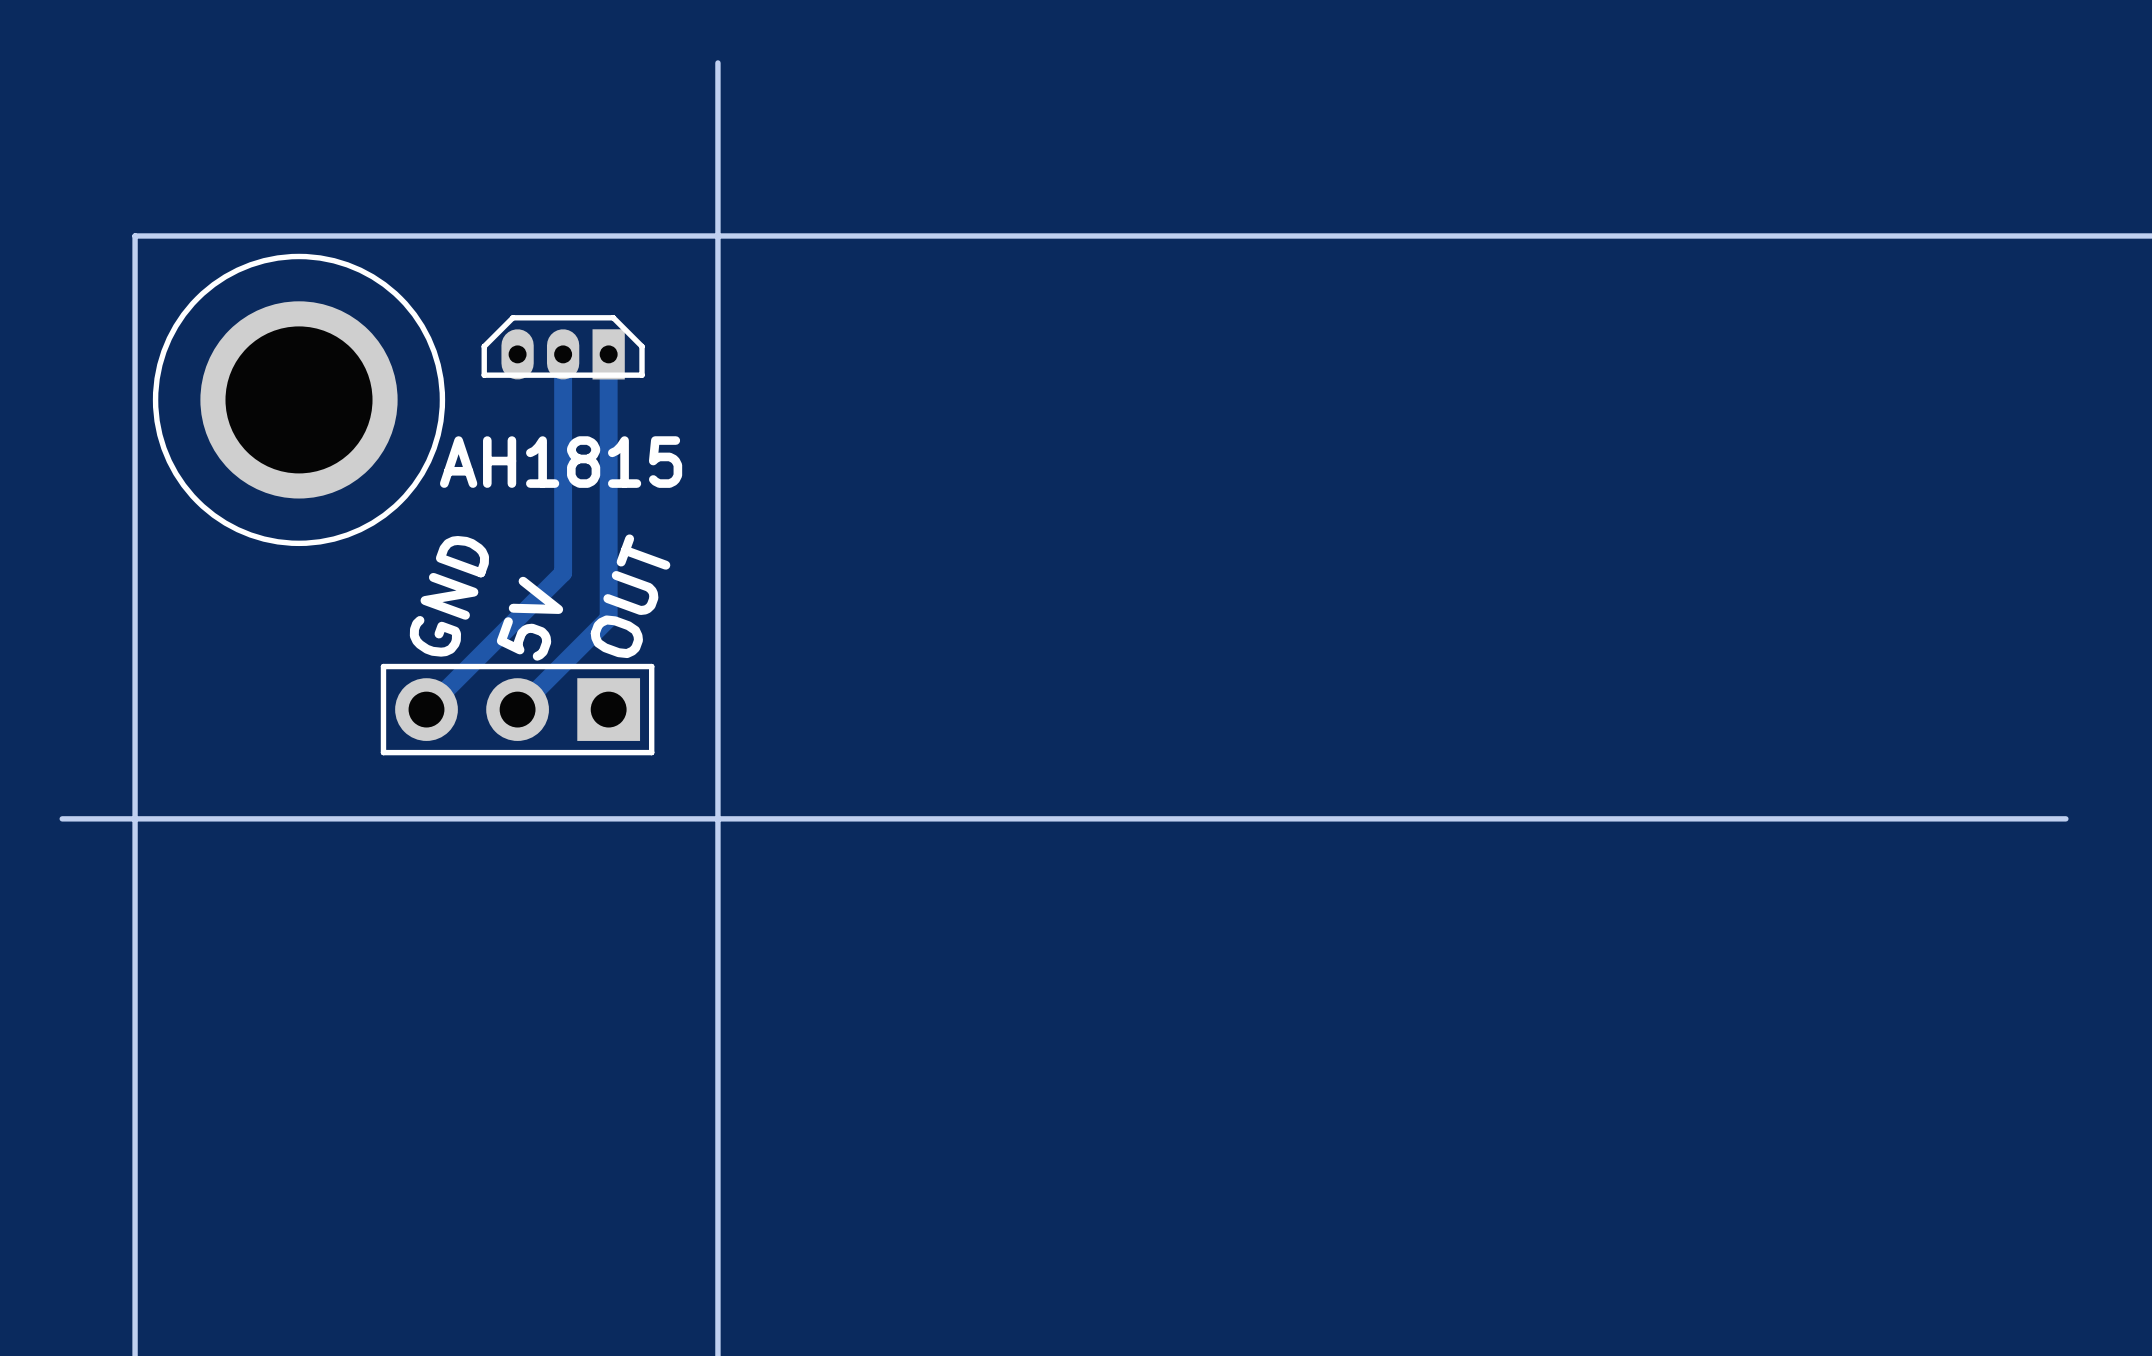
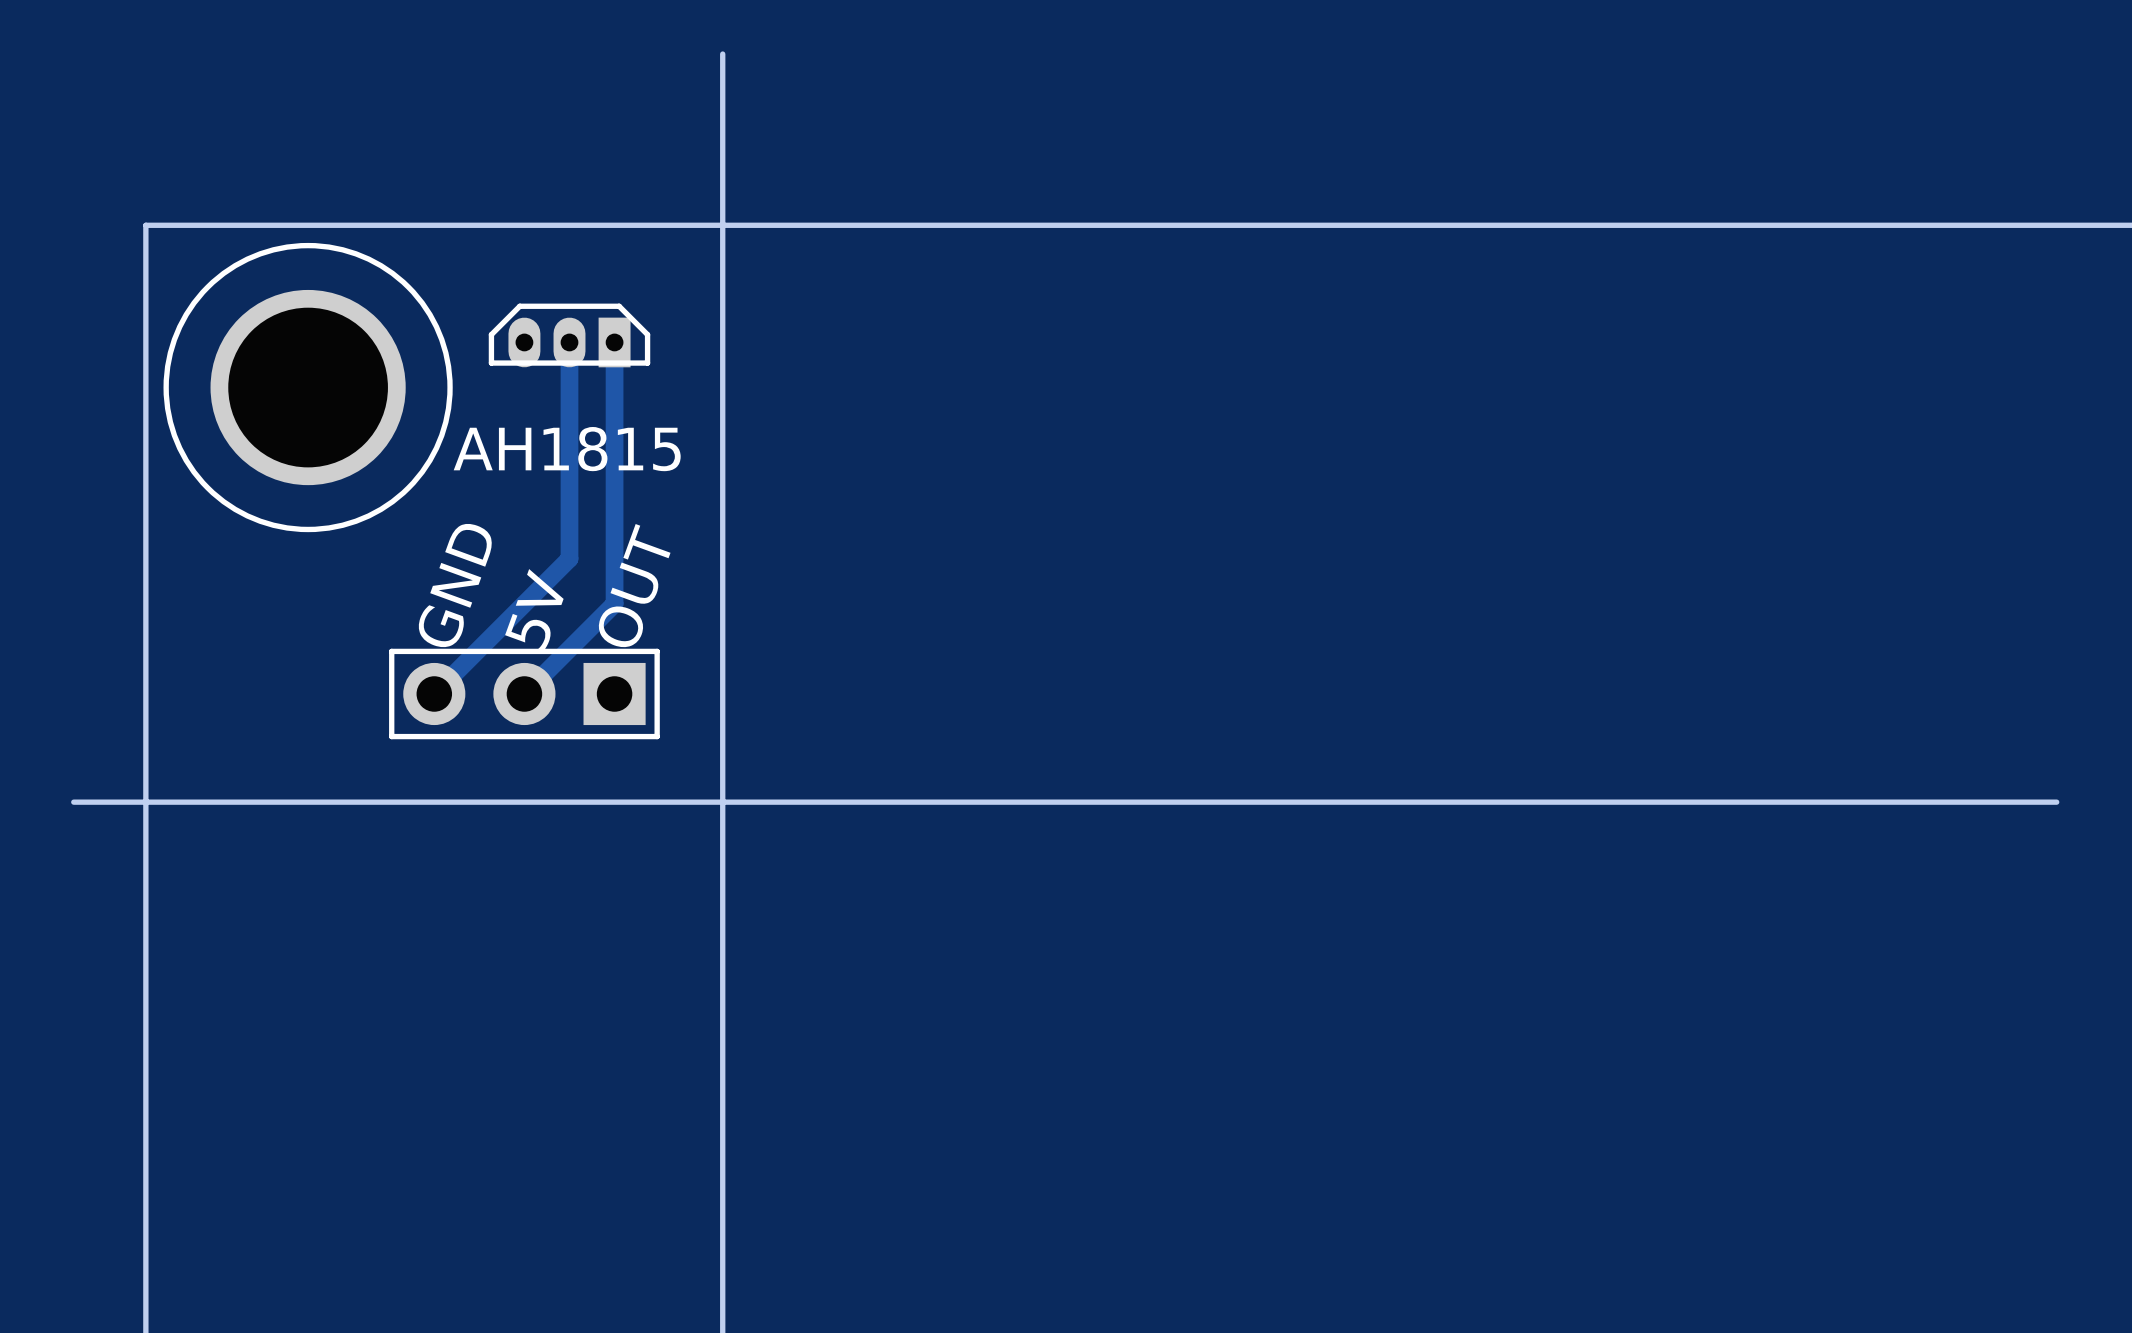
part footprint: [152, 253, 446, 547] -> [163, 242, 453, 533]

